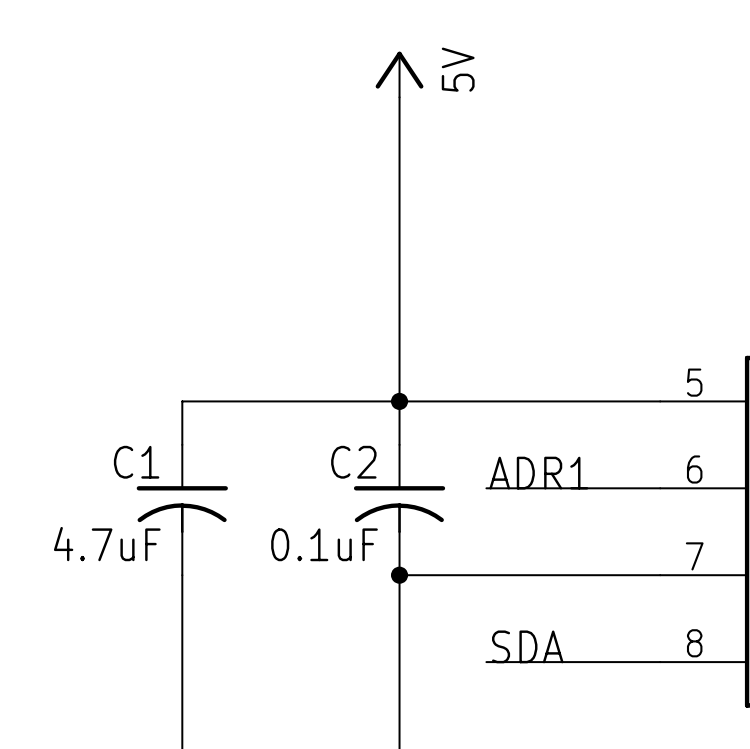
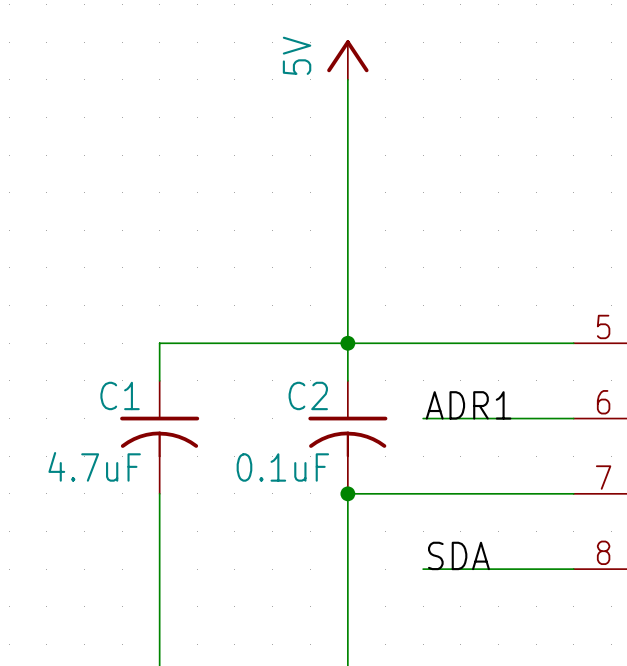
power symbol text position: 5V (458, 69) -> 5V (297, 55)

